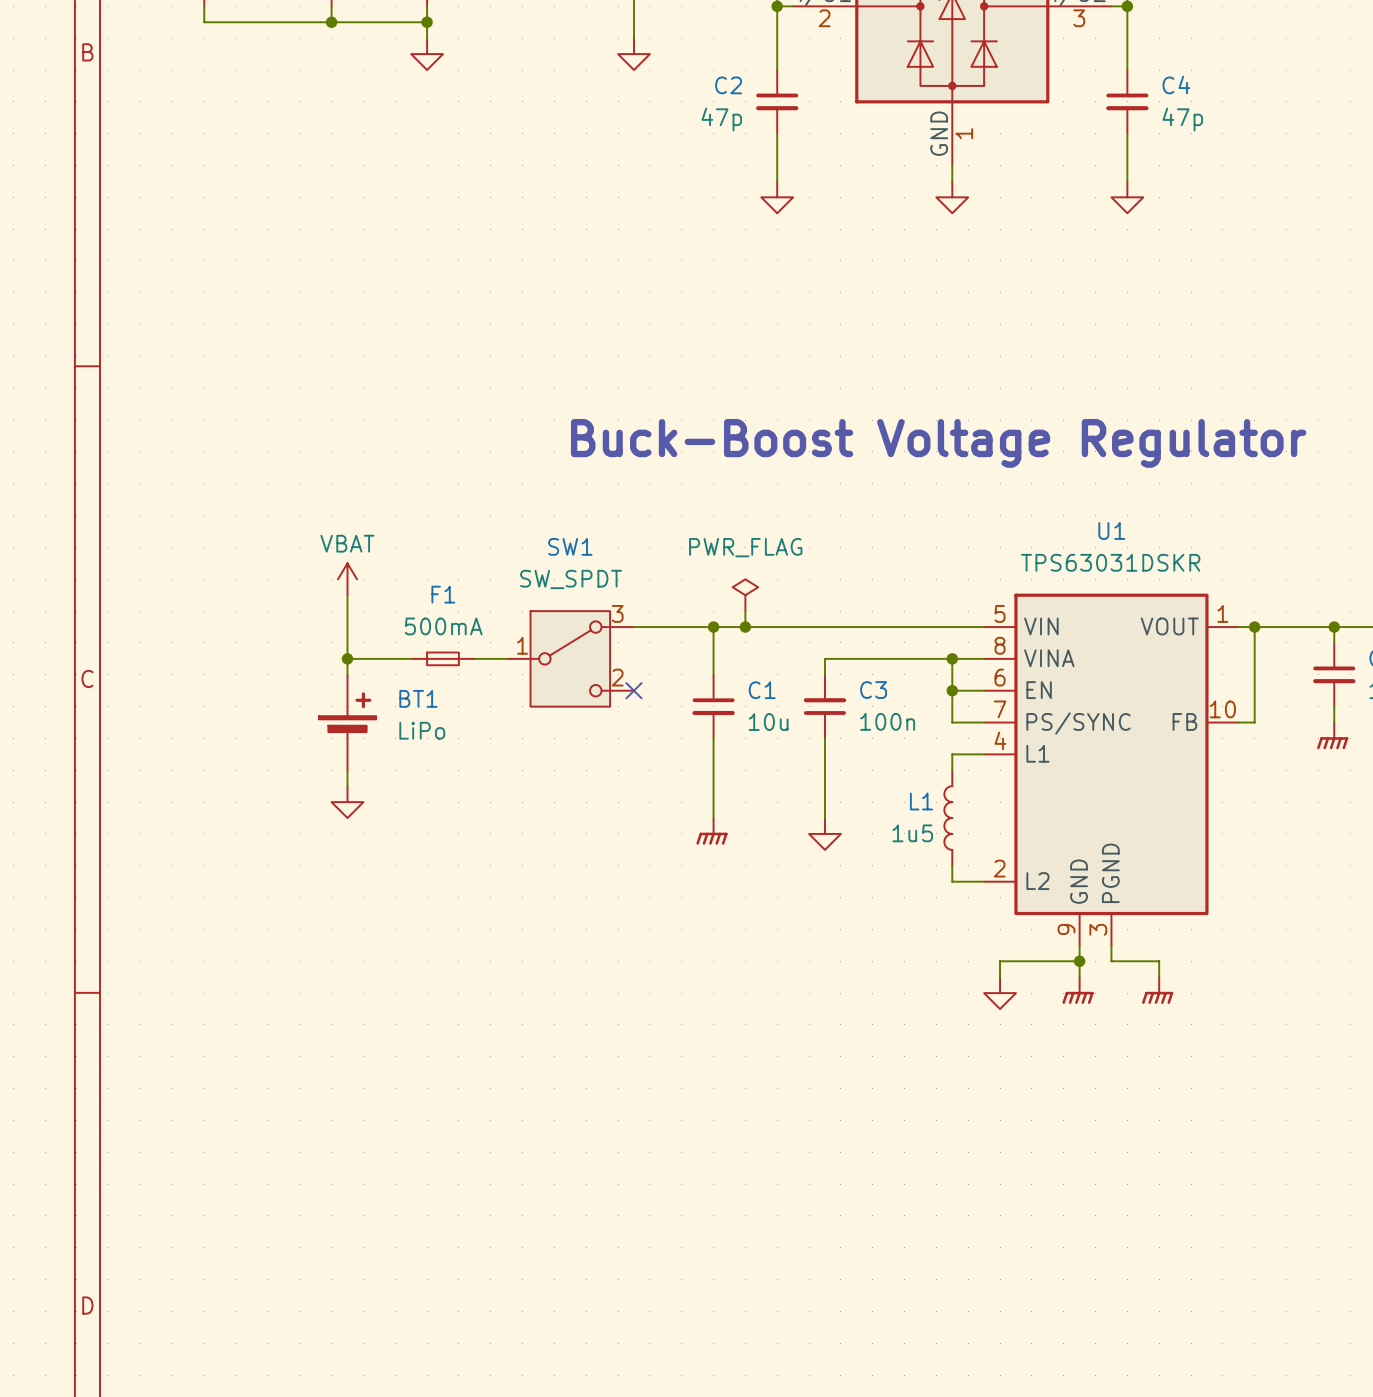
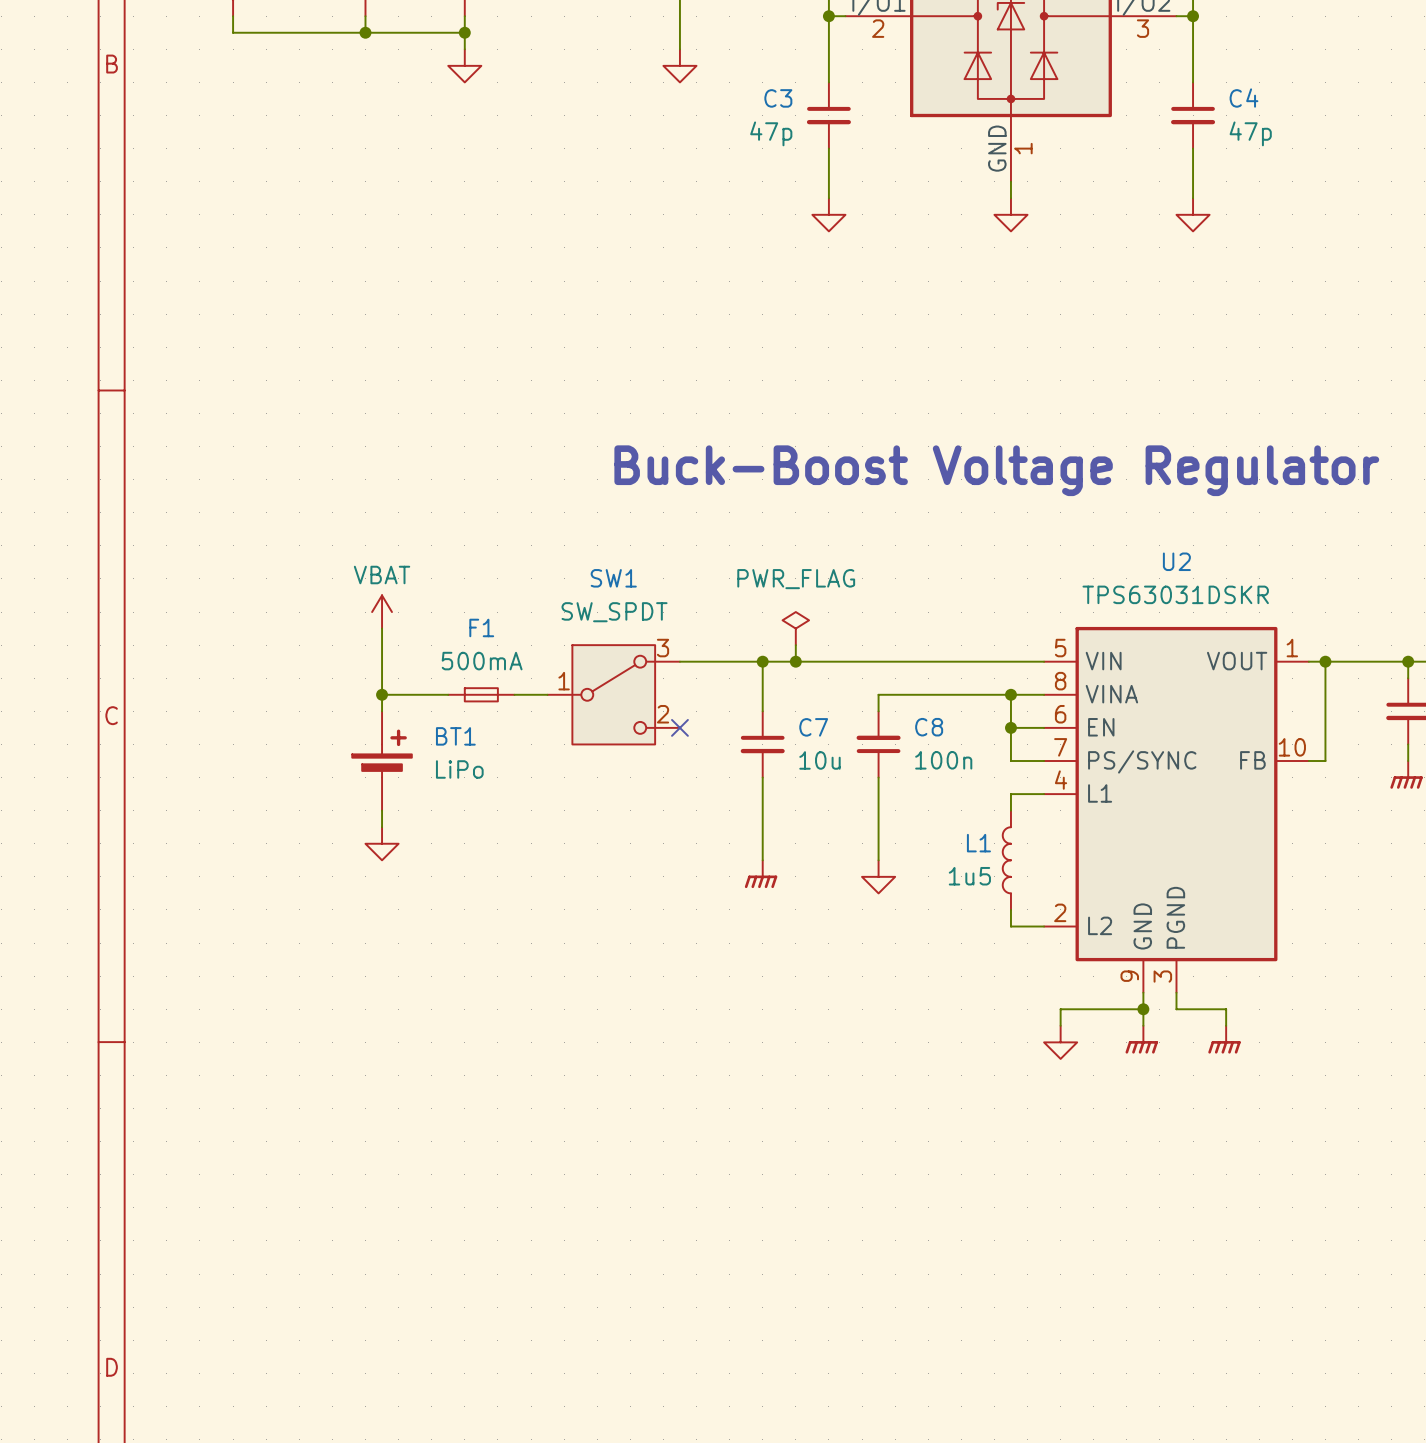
C2 name: C2 (728, 85) -> C3 (778, 98)
U1 name: U1 (1111, 530) -> U2 (1176, 561)
C1 name: C1 (762, 690) -> C7 (813, 727)
C3 name: C3 (873, 690) -> C8 (929, 727)

